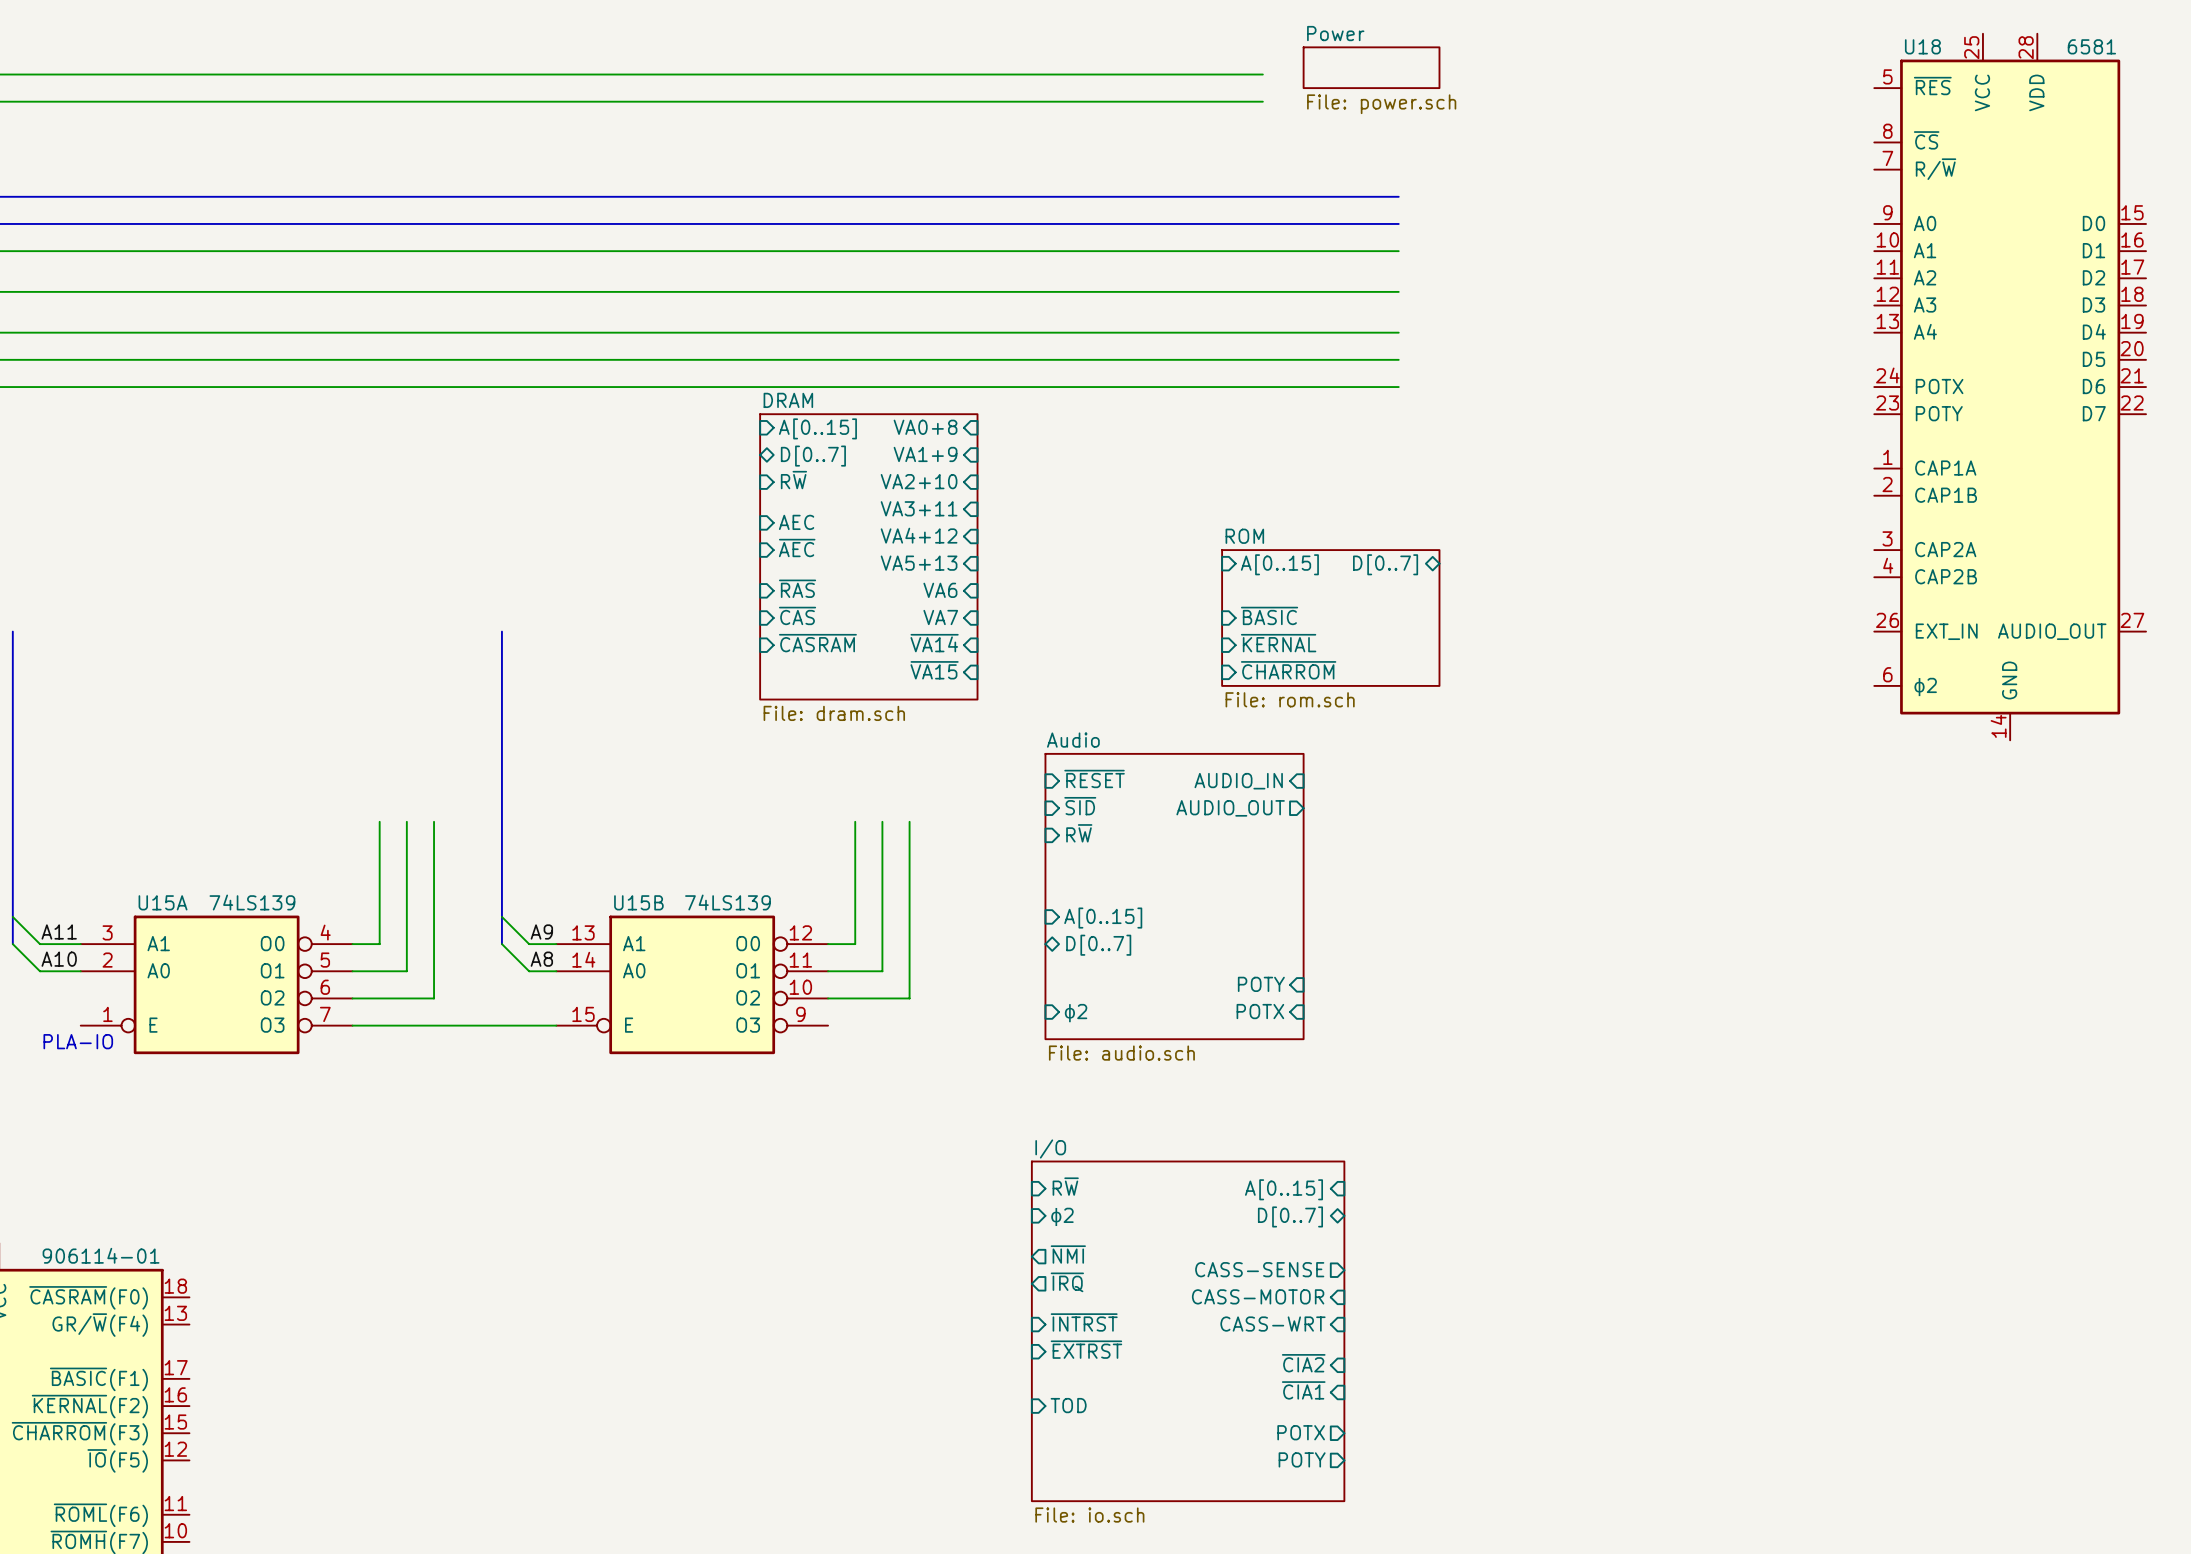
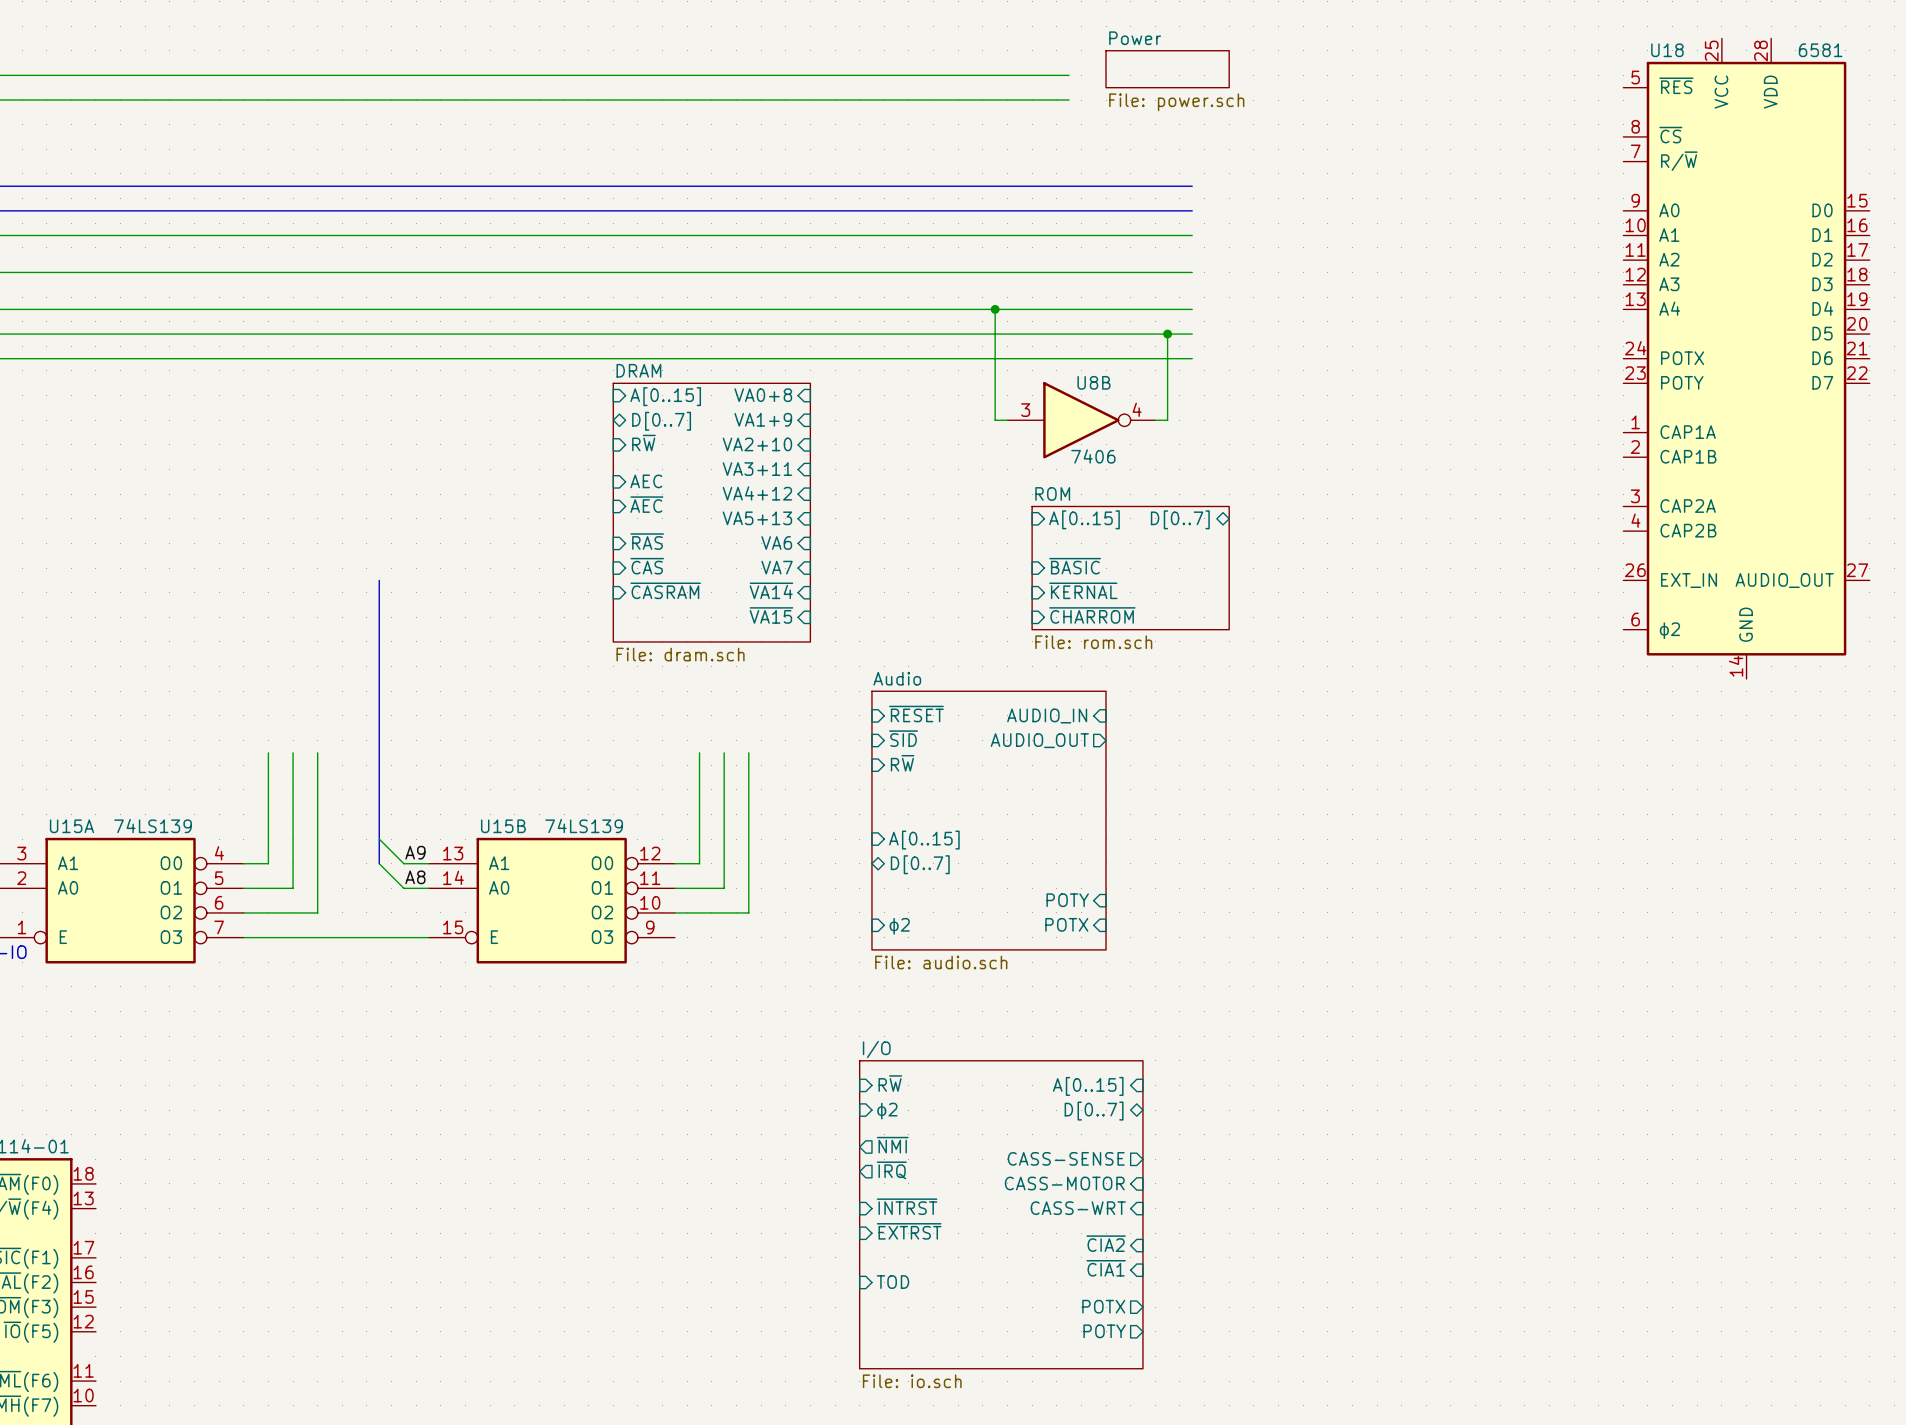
wire: none -> (995, 309) (995, 420) (1007, 420)
junction: none -> (995, 309)
wire: none -> (1167, 334) (1167, 420) (1155, 420)
junction: none -> (1167, 334)
U8B: none -> 7406 (1081, 420)

